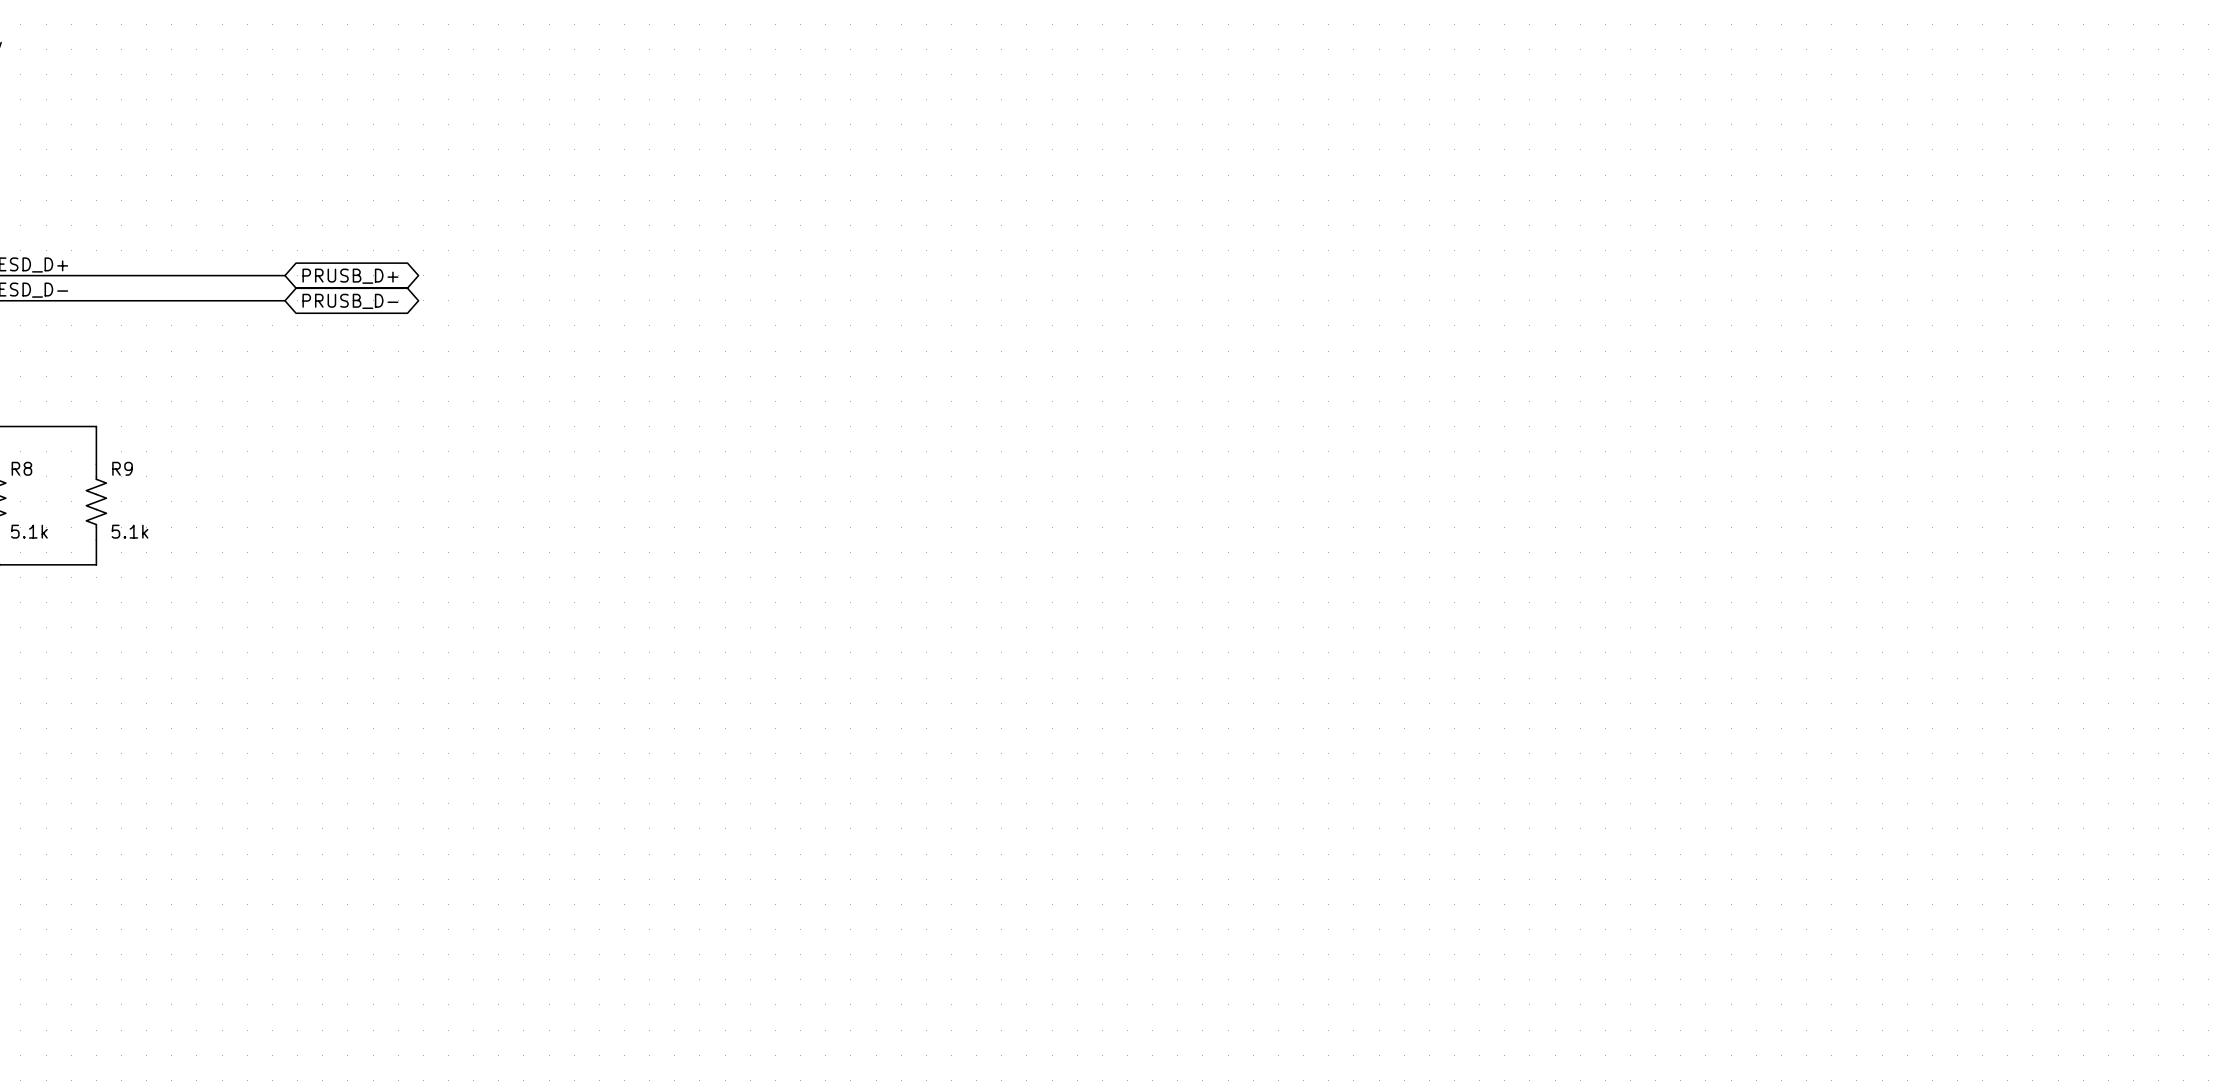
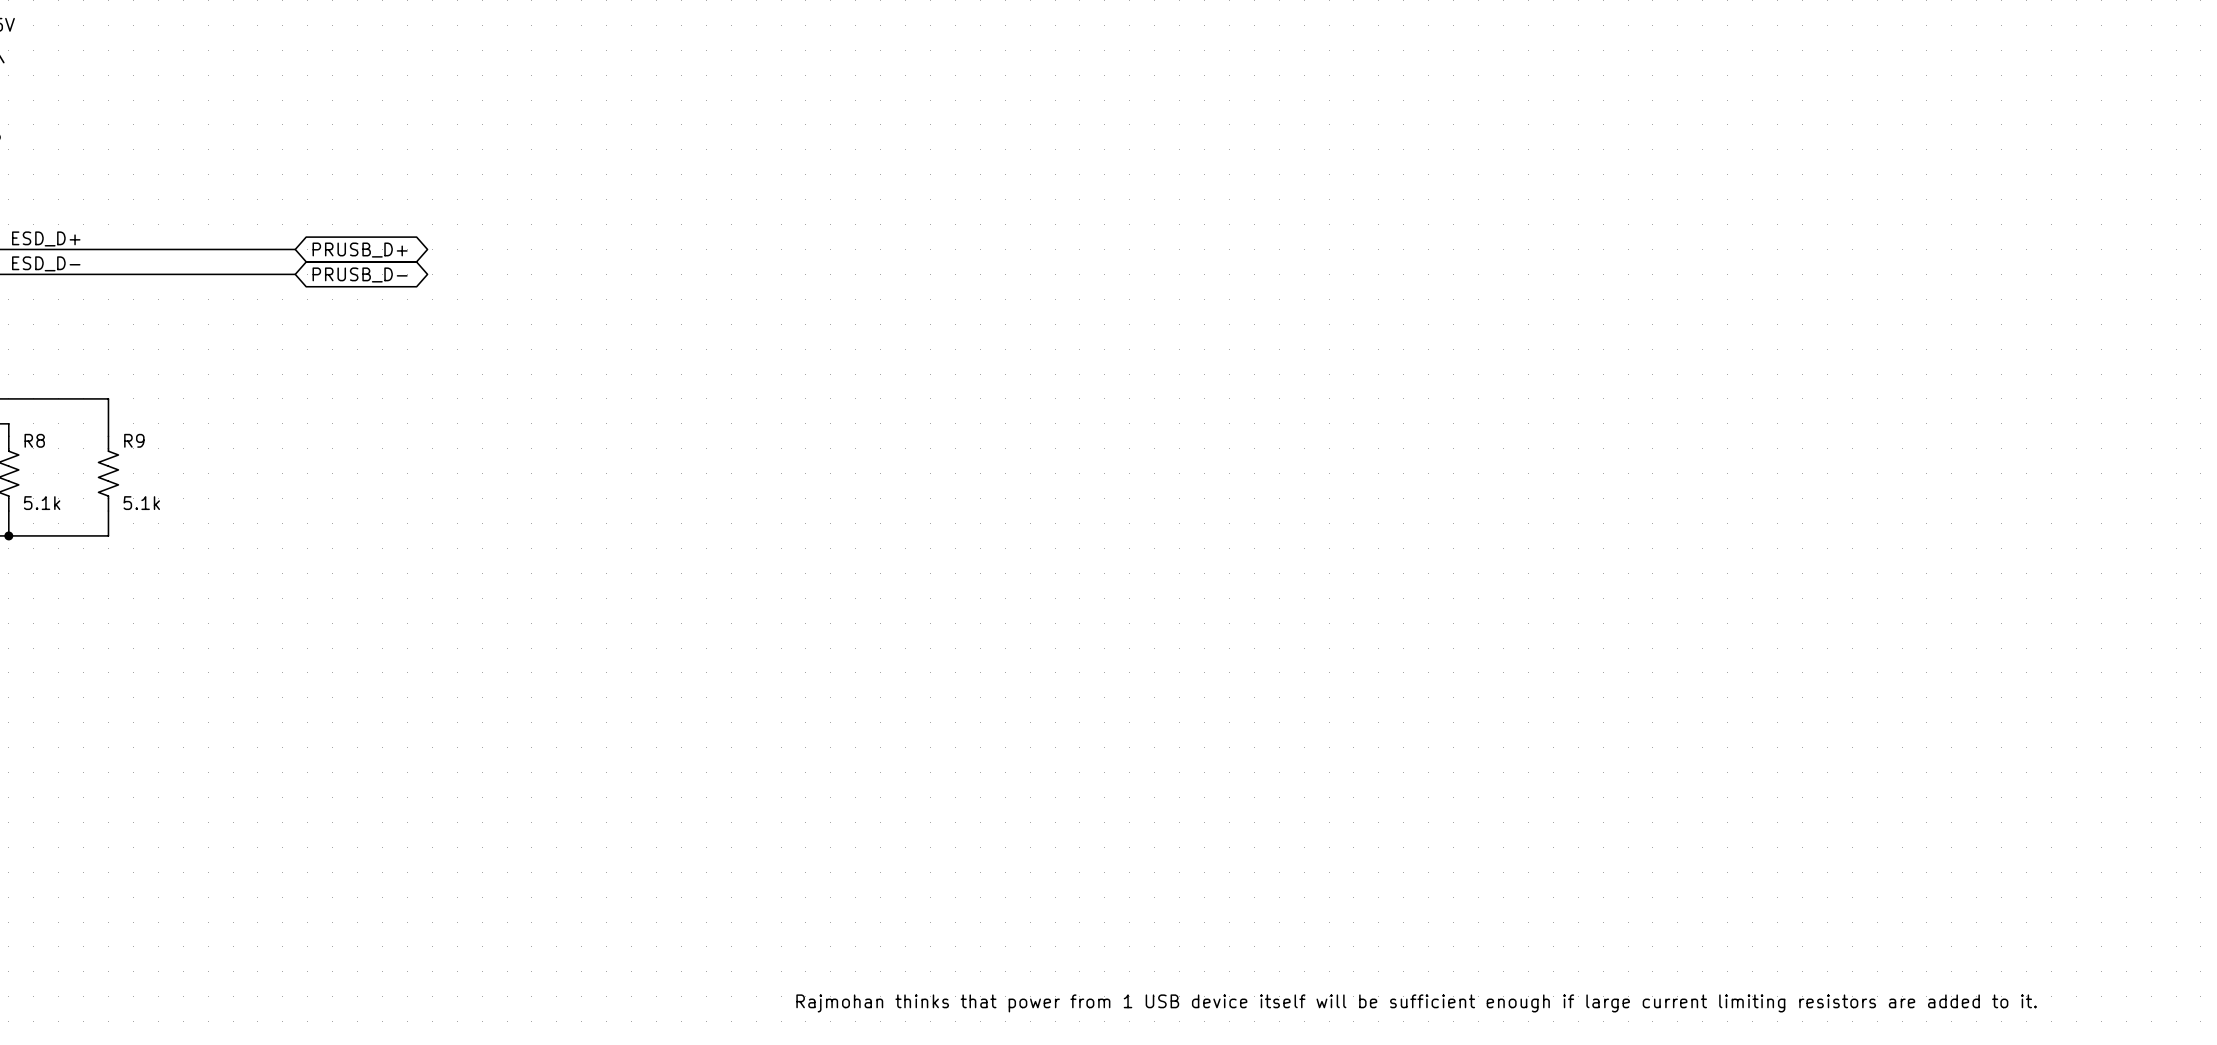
text: none -> Rajmohan thinks that power from 1 USB device itself will be sufficient enough if large current limiting resistors are added to it. (1416, 1003)

